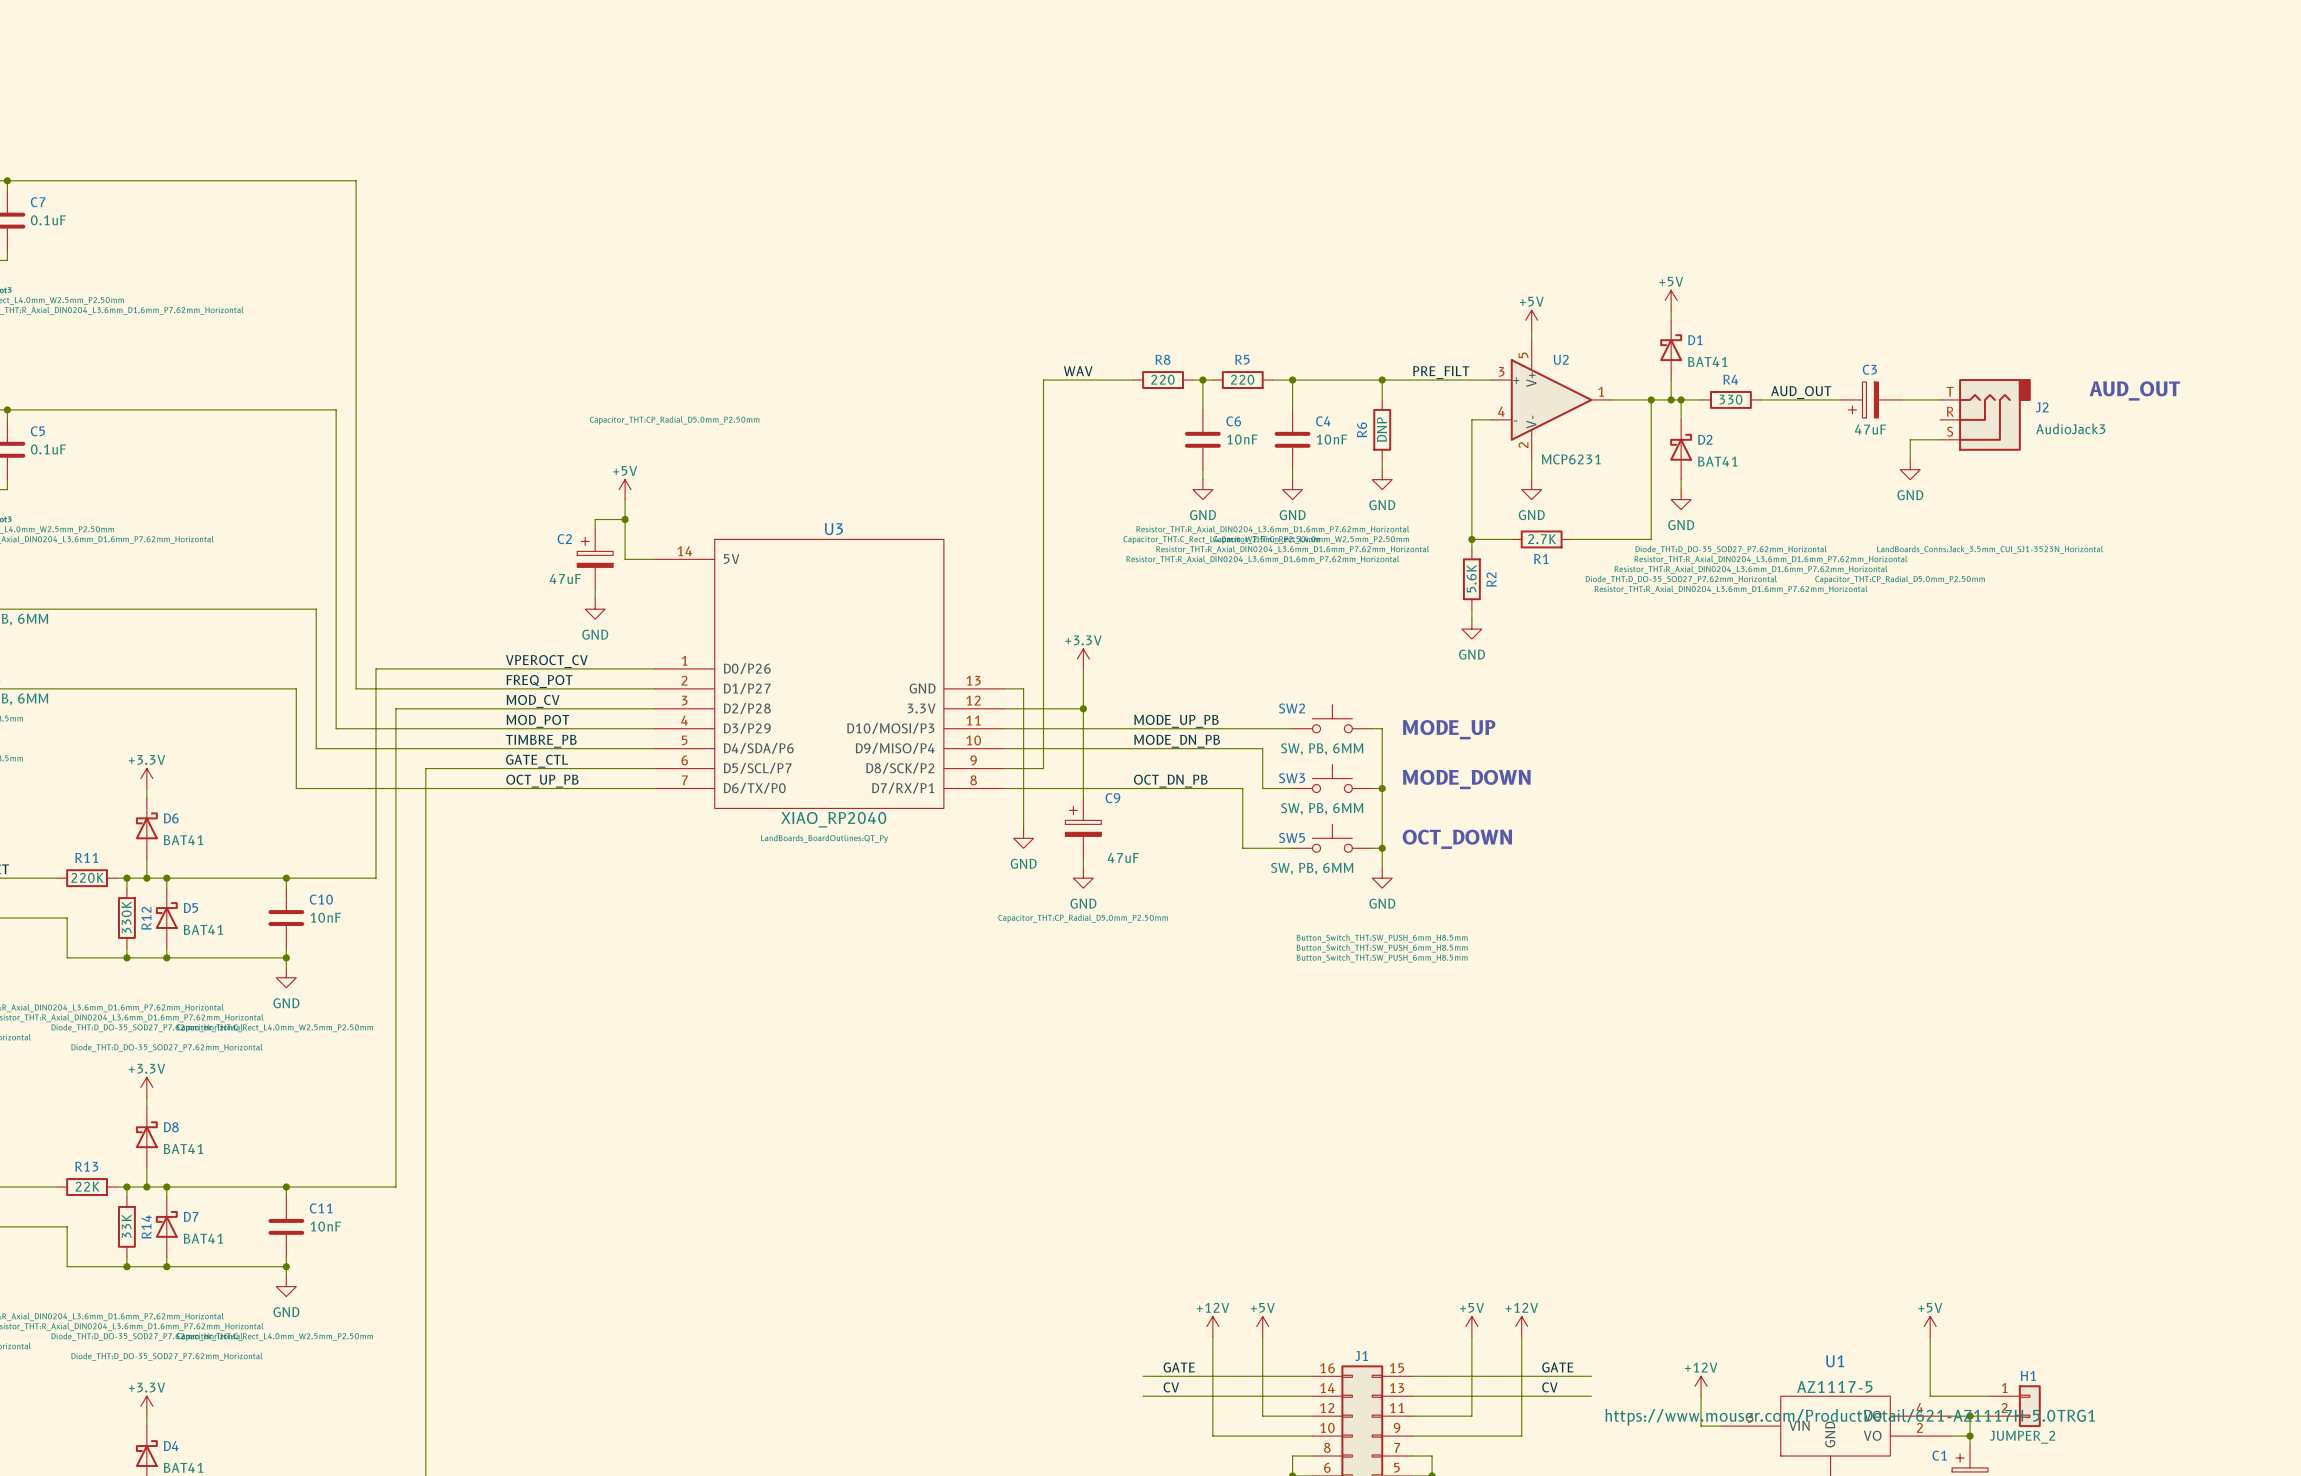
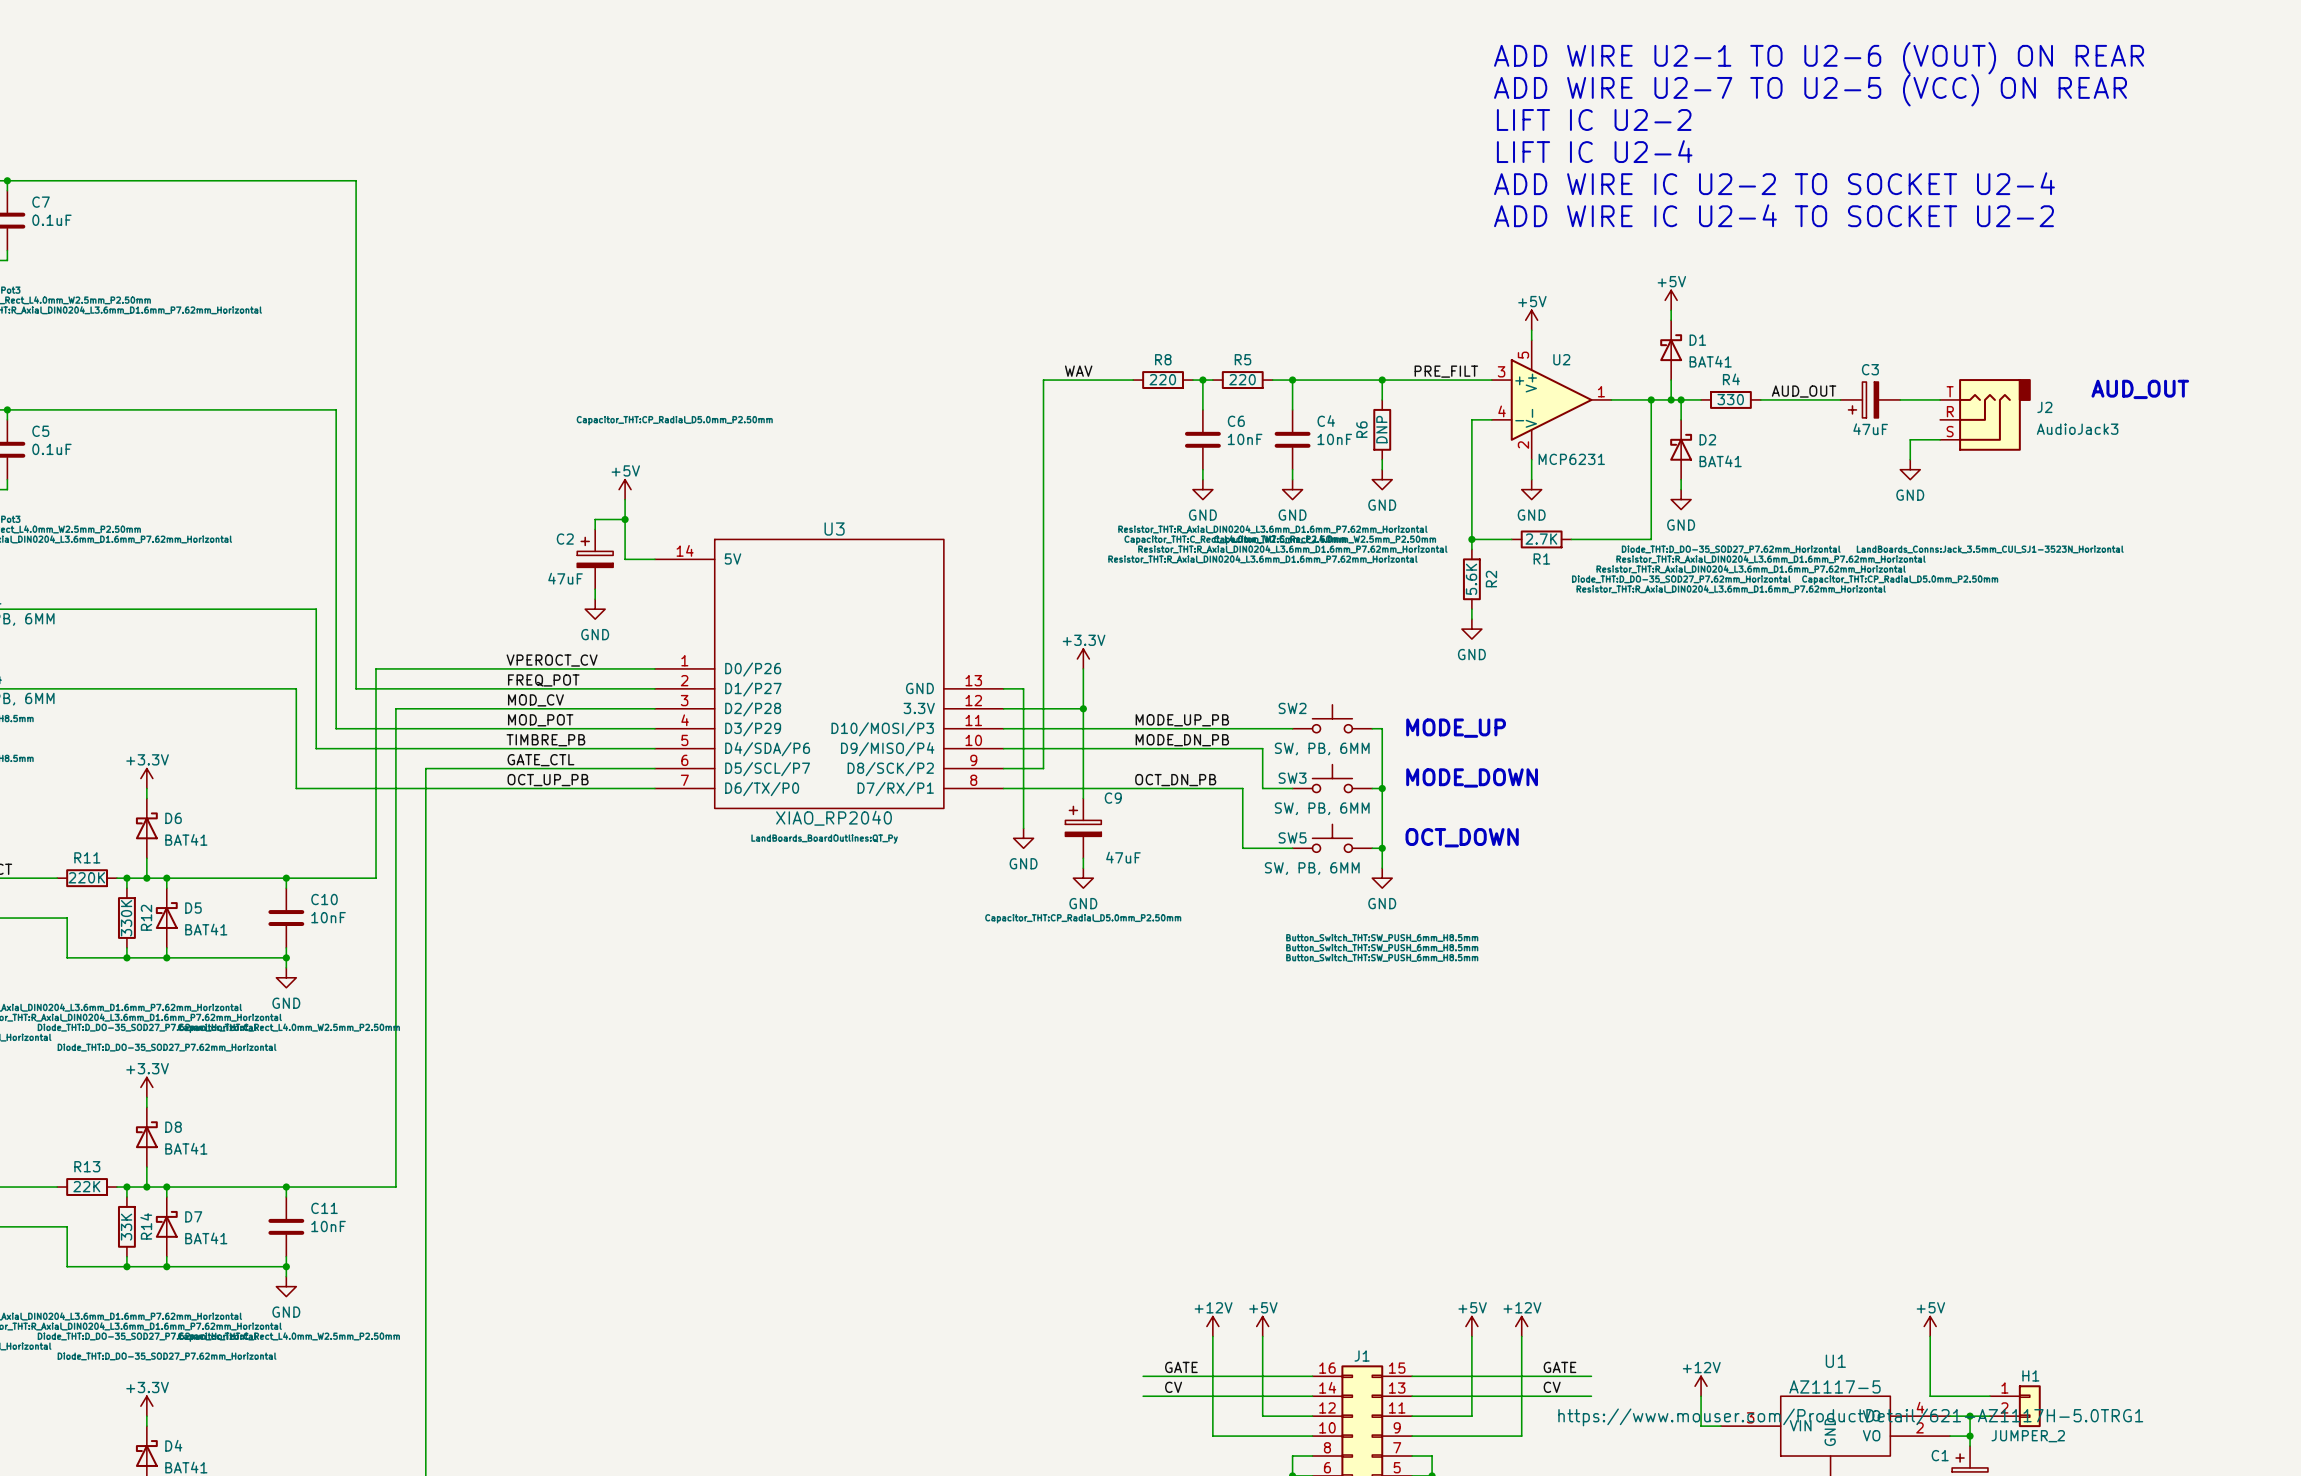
text: none -> ADD WIRE U2-1 TO U2-6 (VOUT) ON REAR (1819, 58)
text: none -> ADD WIRE U2-7 TO U2-5 (VCC) ON REAR (1810, 90)
text: none -> LIFT IC U2-2 (1594, 119)
text: none -> LIFT IC U2-4 (1594, 151)
text: none -> ADD WIRE IC U2-2 TO SOCKET U2-4 (1774, 183)
text: none -> ADD WIRE IC U2-4 TO SOCKET U2-2 (1773, 215)

